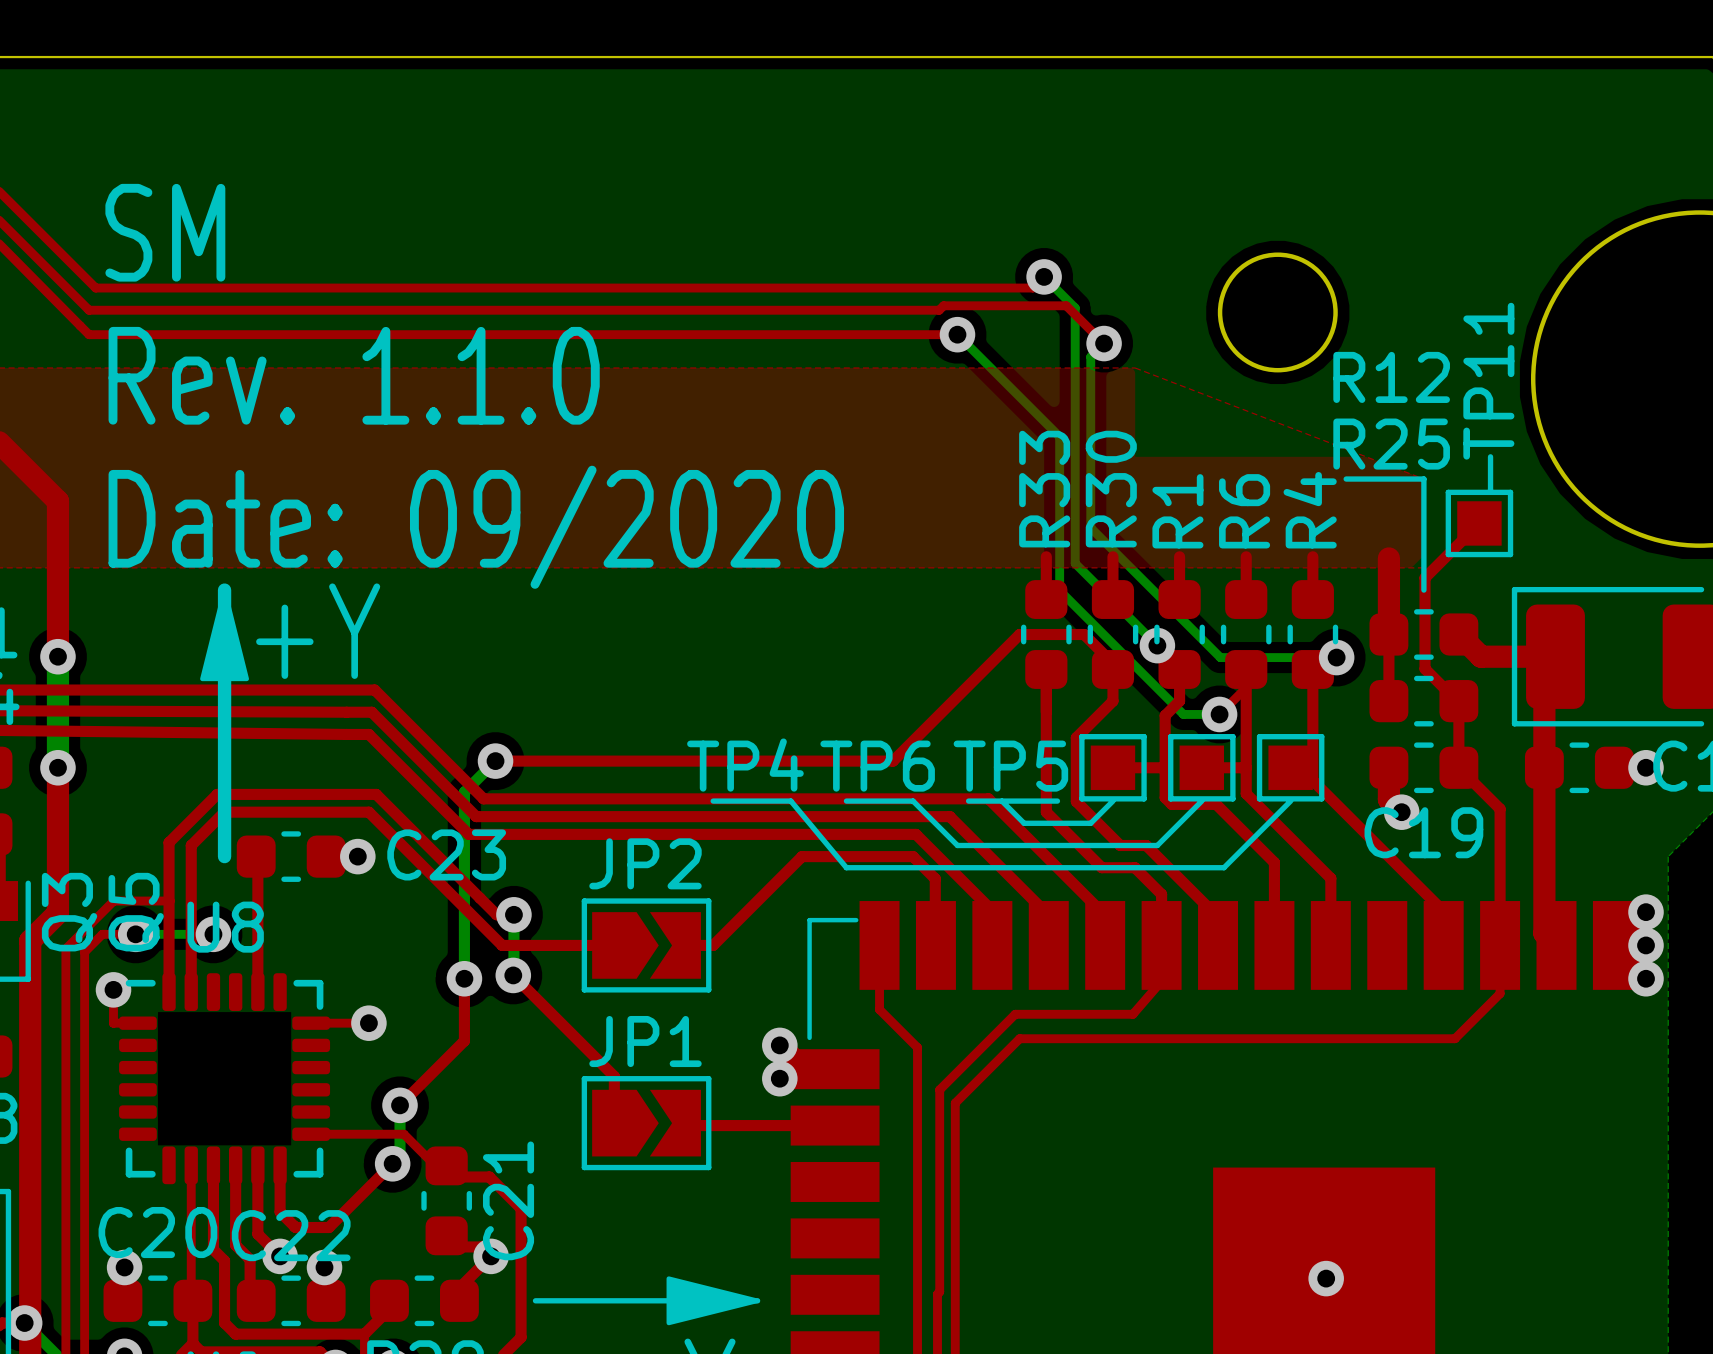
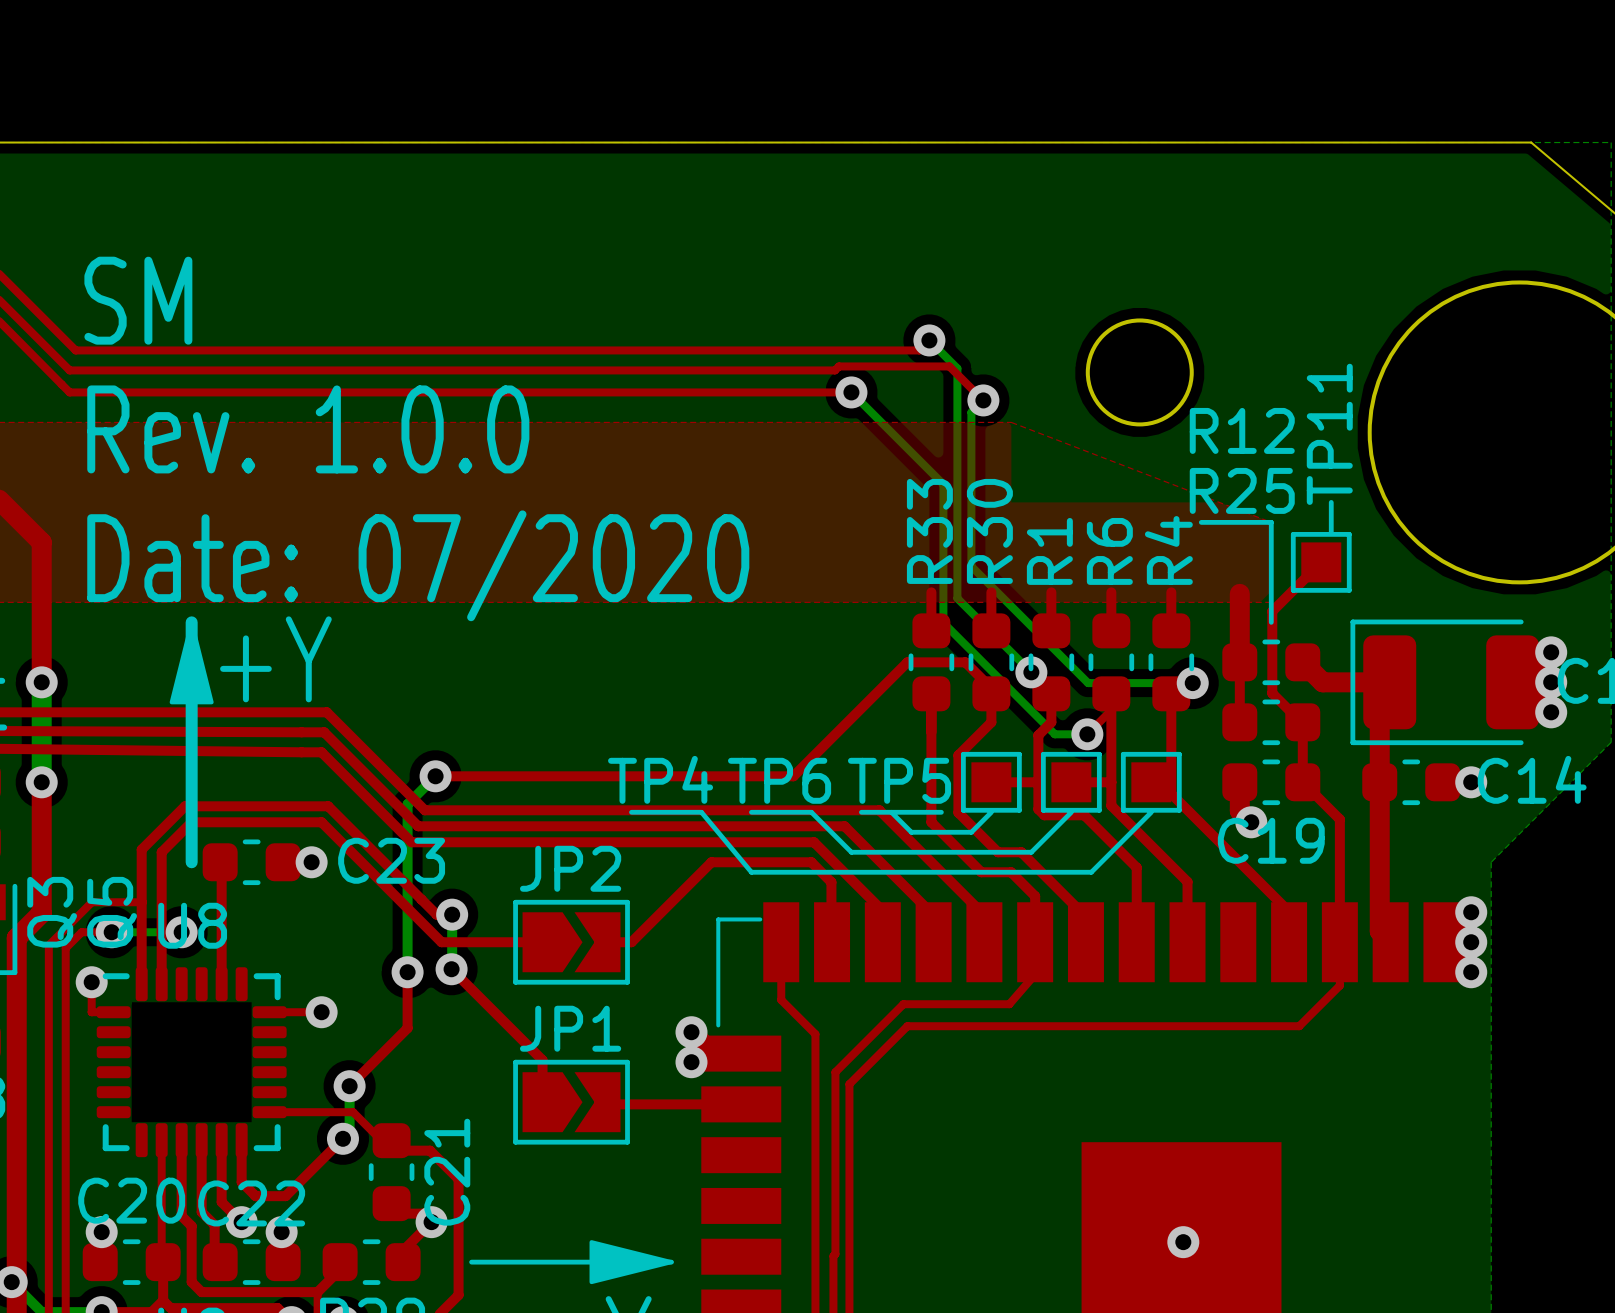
text: Rev. 1.1.0 (354, 375) -> Rev. 1.0.0 (308, 429)
text: Date: 09/2020 (476, 527) -> Date: 07/2020 (418, 565)

